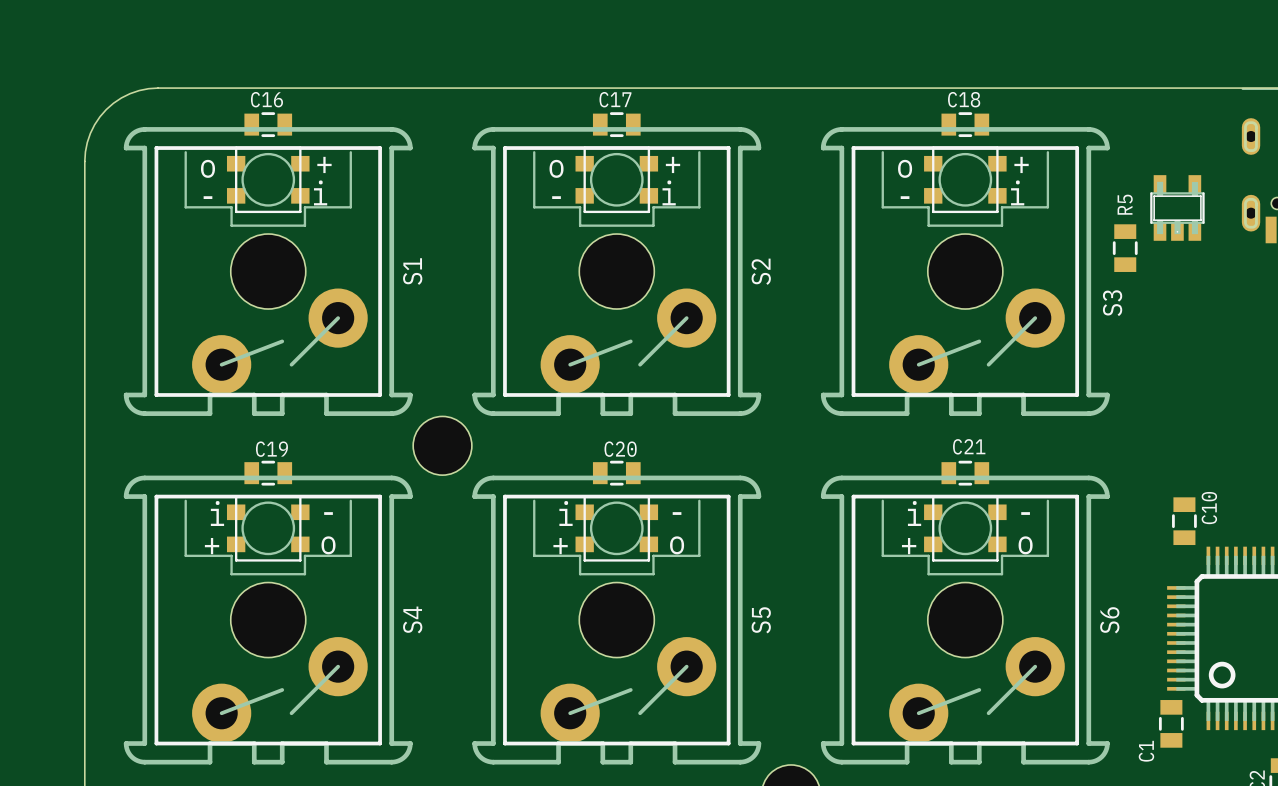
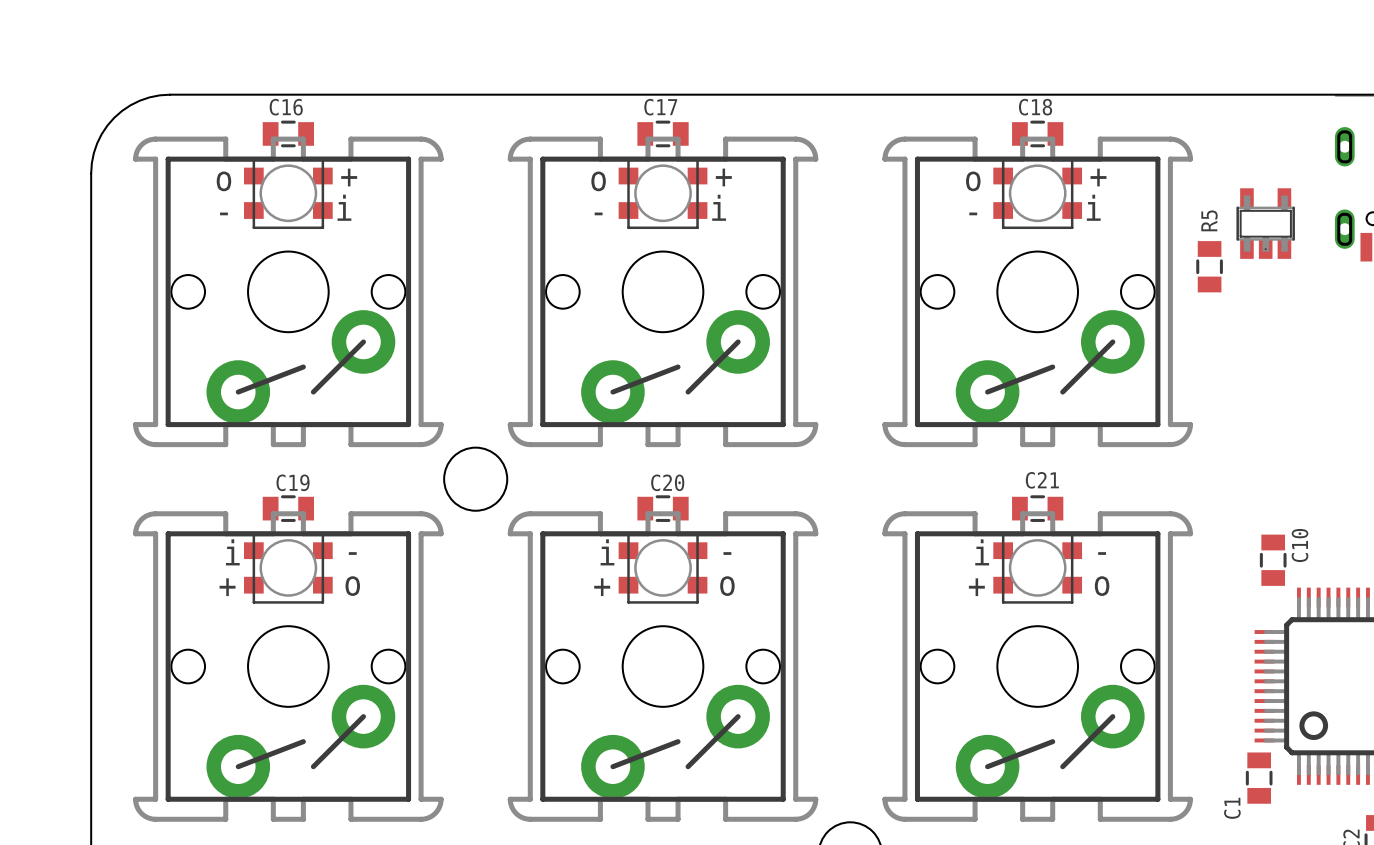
S1: (268, 271) -> none
part: none -> (288, 291)
S2: (616, 271) -> none
part: none -> (663, 291)
S3: (965, 271) -> none
part: none -> (1037, 291)
S4: (268, 620) -> none
part: none -> (288, 666)
S5: (616, 620) -> none
part: none -> (663, 666)
S6: (965, 620) -> none
part: none -> (1037, 666)

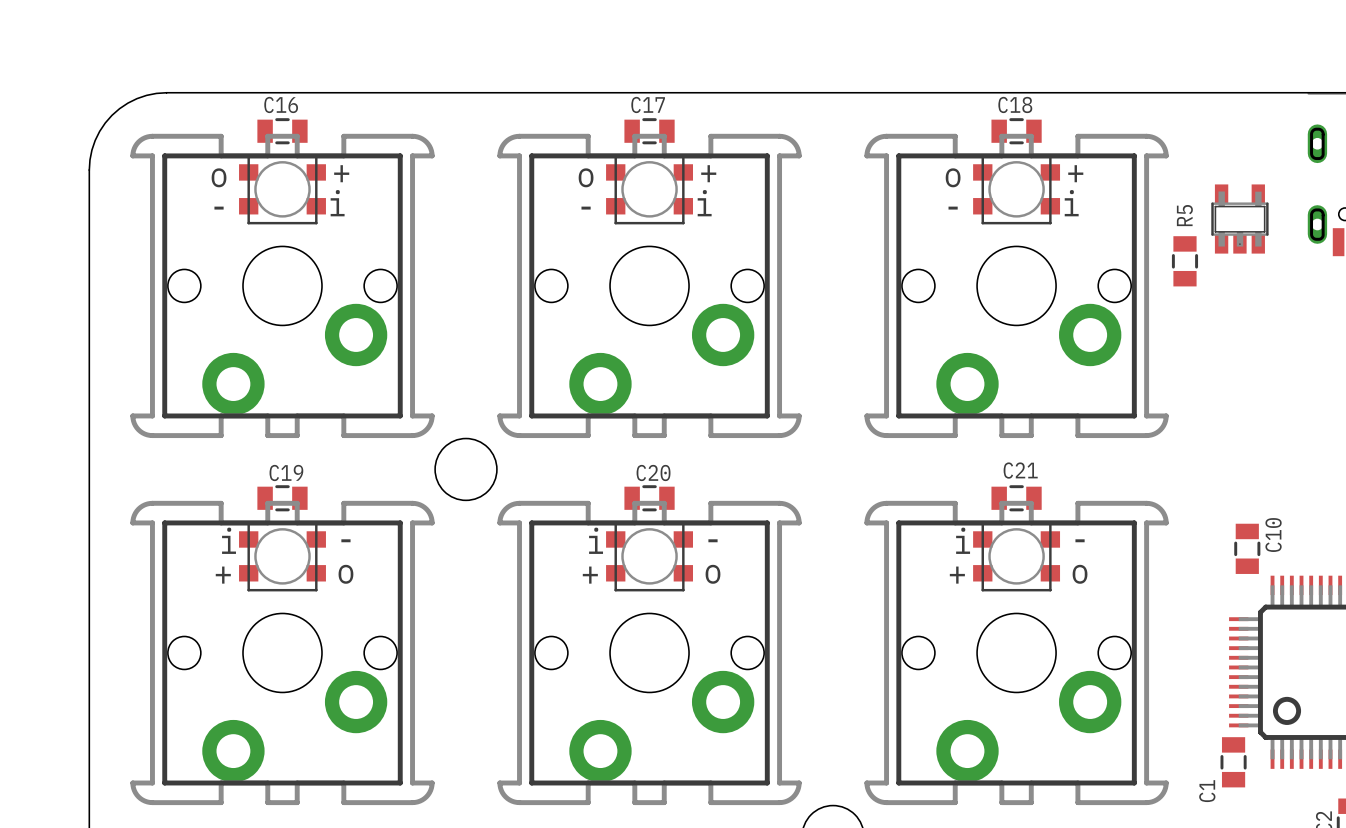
part footprint: [133, 136, 444, 448] -> [130, 133, 435, 439]
part footprint: [507, 136, 819, 448] -> [497, 133, 802, 439]
part footprint: [882, 136, 1193, 448] -> [864, 133, 1169, 439]
part footprint: [133, 511, 444, 822] -> [130, 500, 435, 806]
part footprint: [507, 511, 819, 822] -> [497, 500, 802, 806]
part footprint: [882, 511, 1193, 822] -> [864, 500, 1169, 806]

